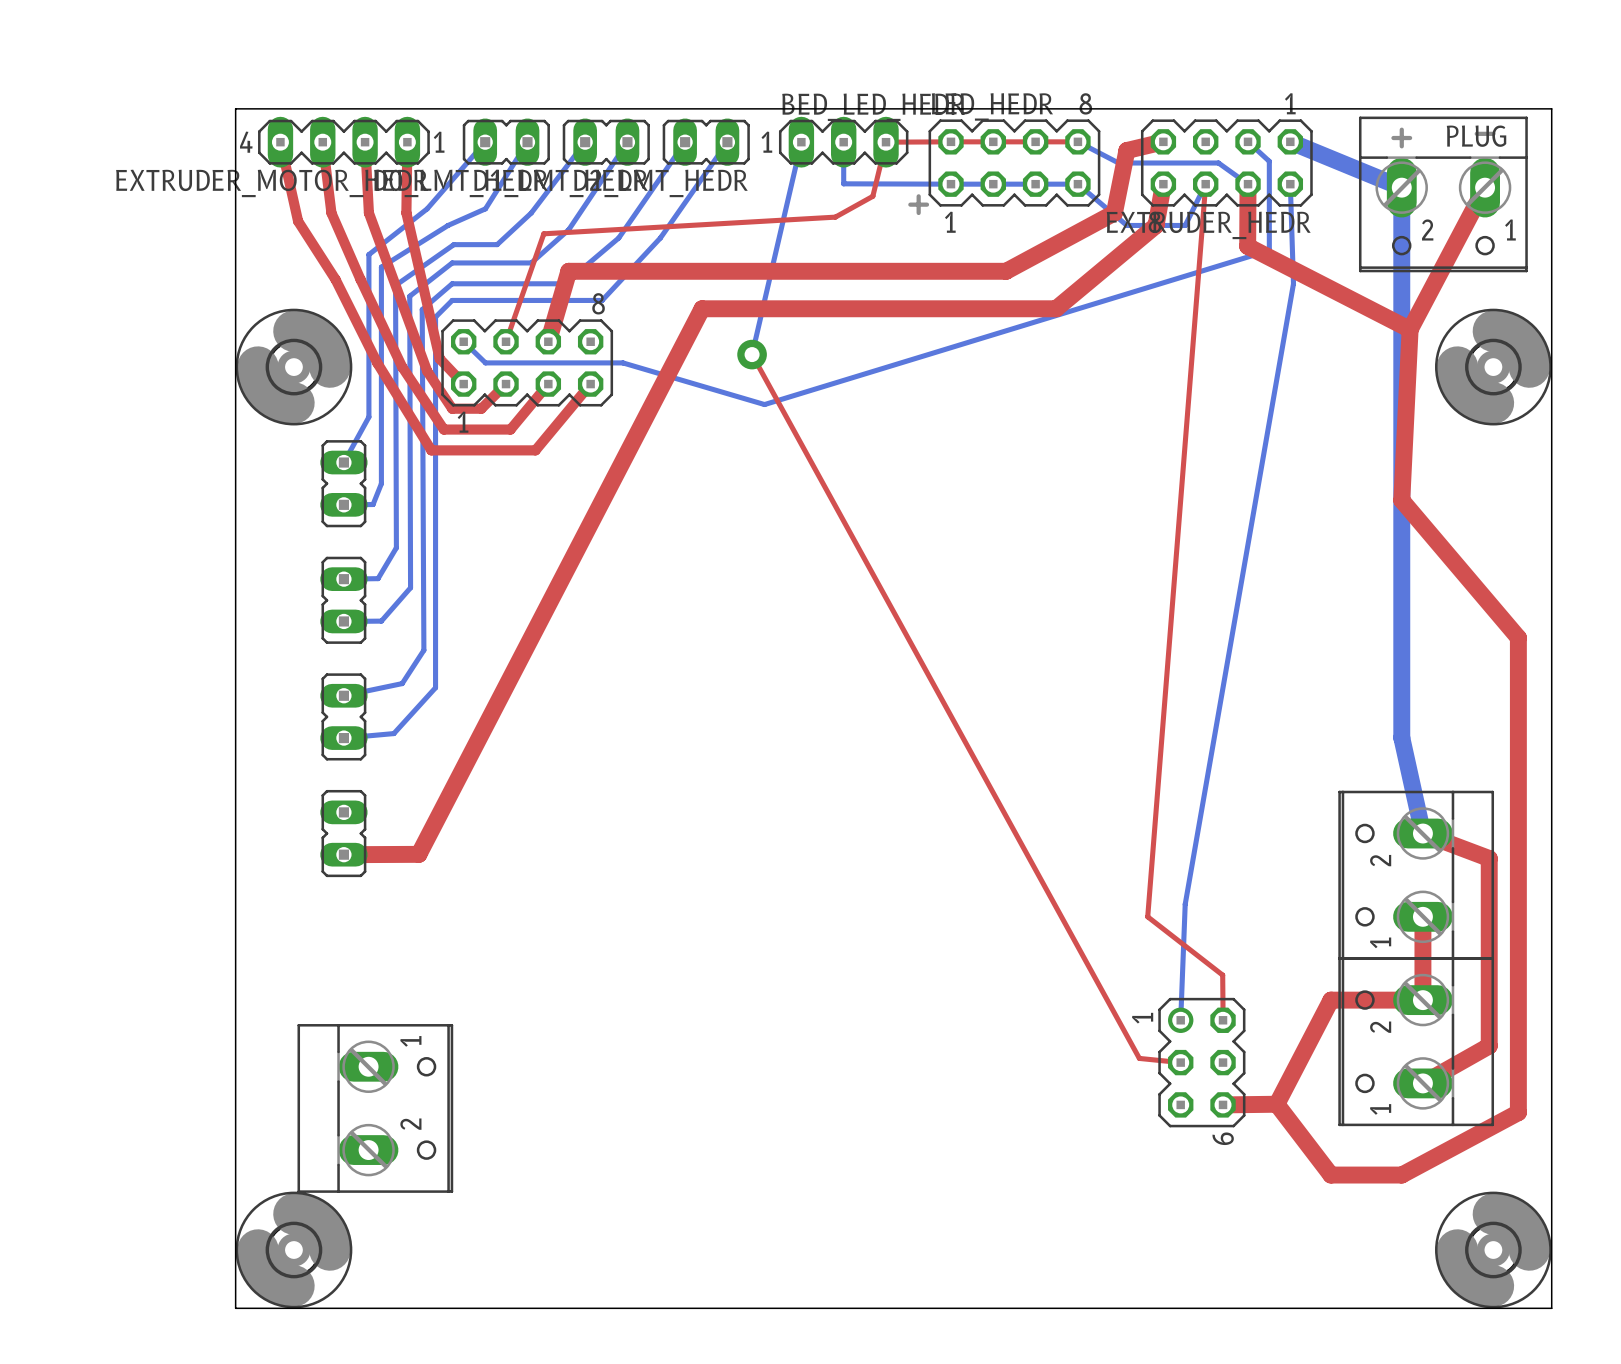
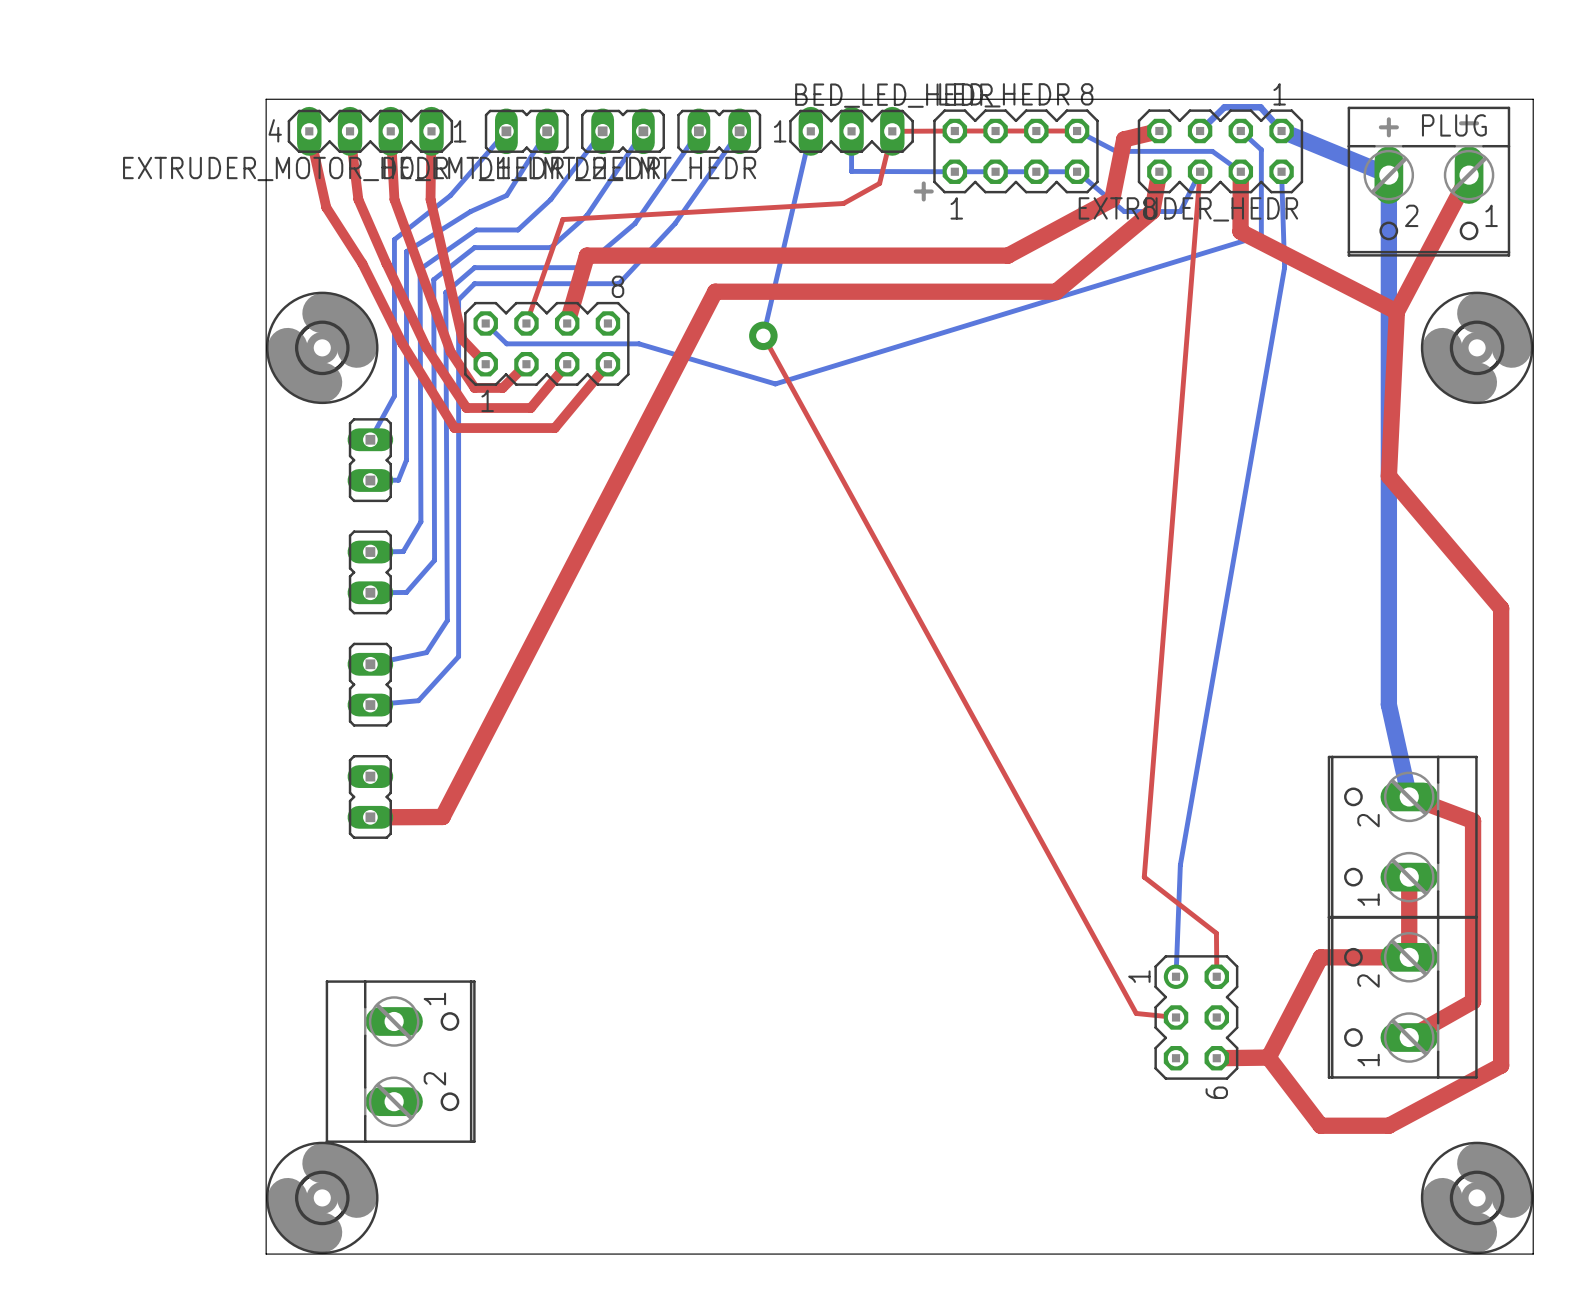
bottom track: none -> (1200, 131) (1224, 107) (1260, 107) (1281, 131)

